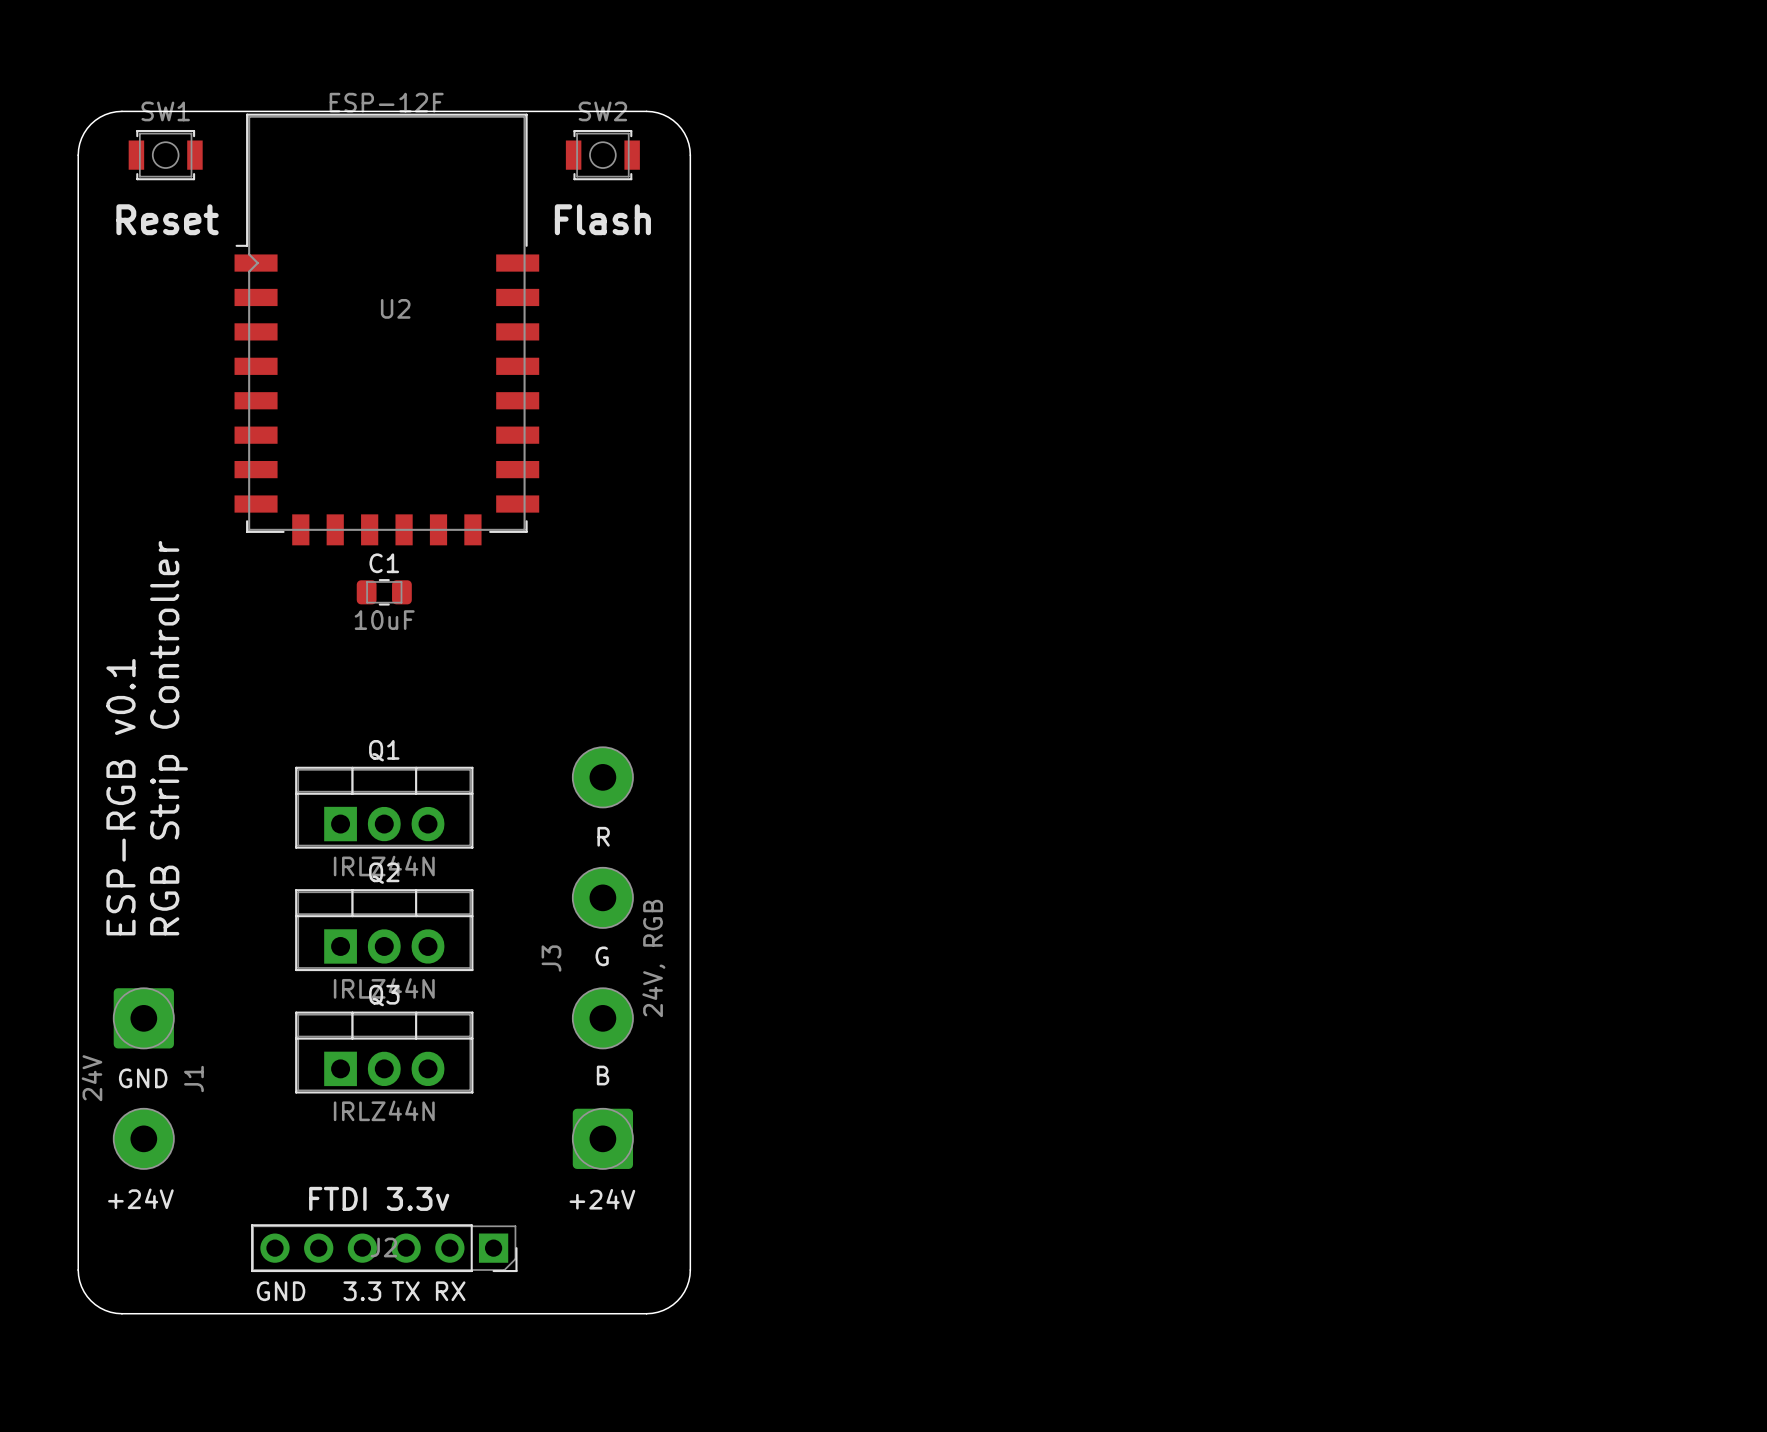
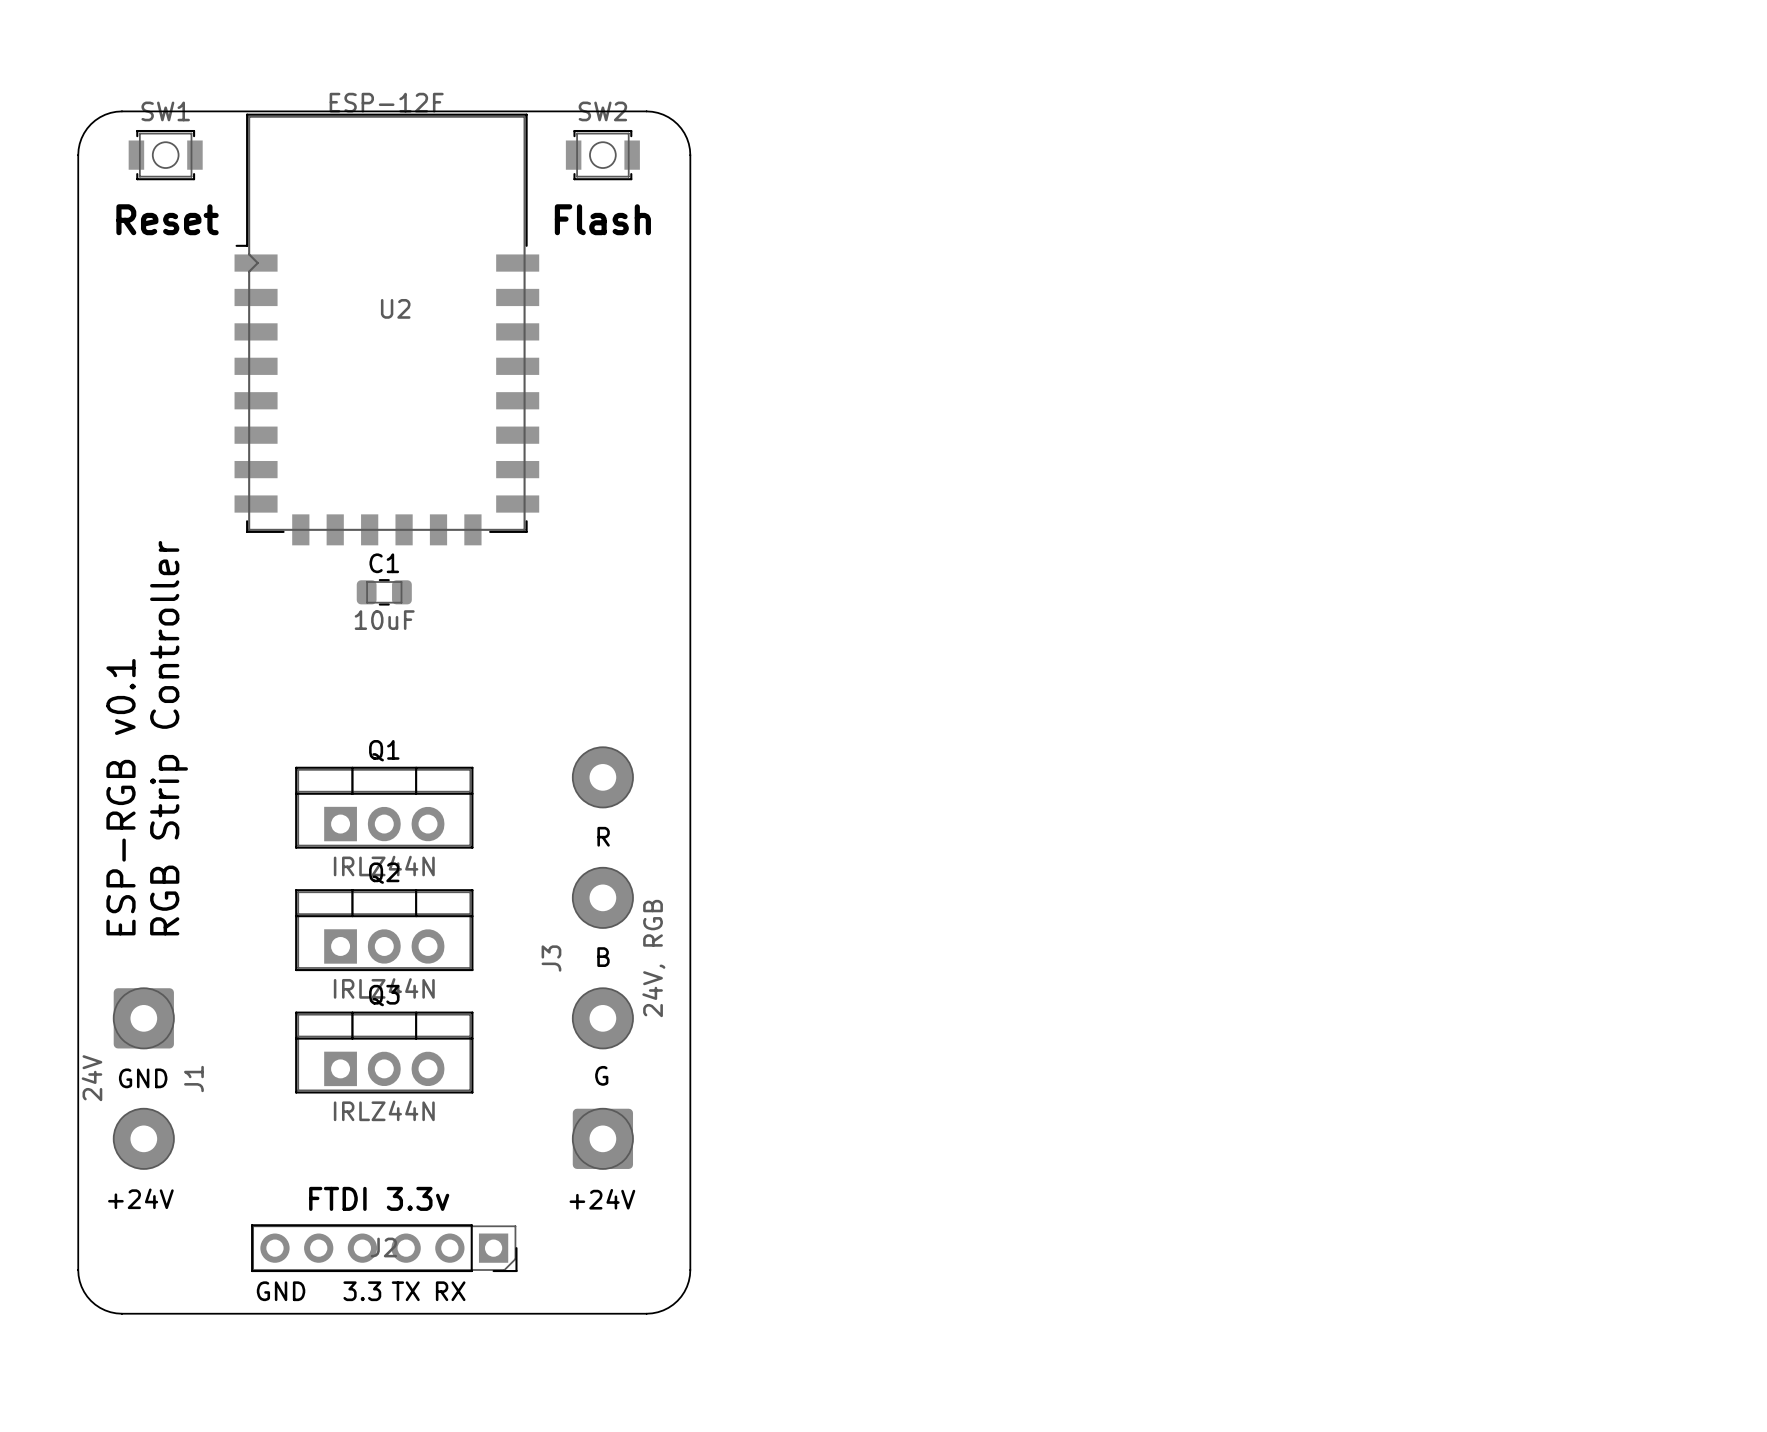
text: G (602, 956) -> B (603, 957)
text: B (603, 1075) -> G (601, 1075)

